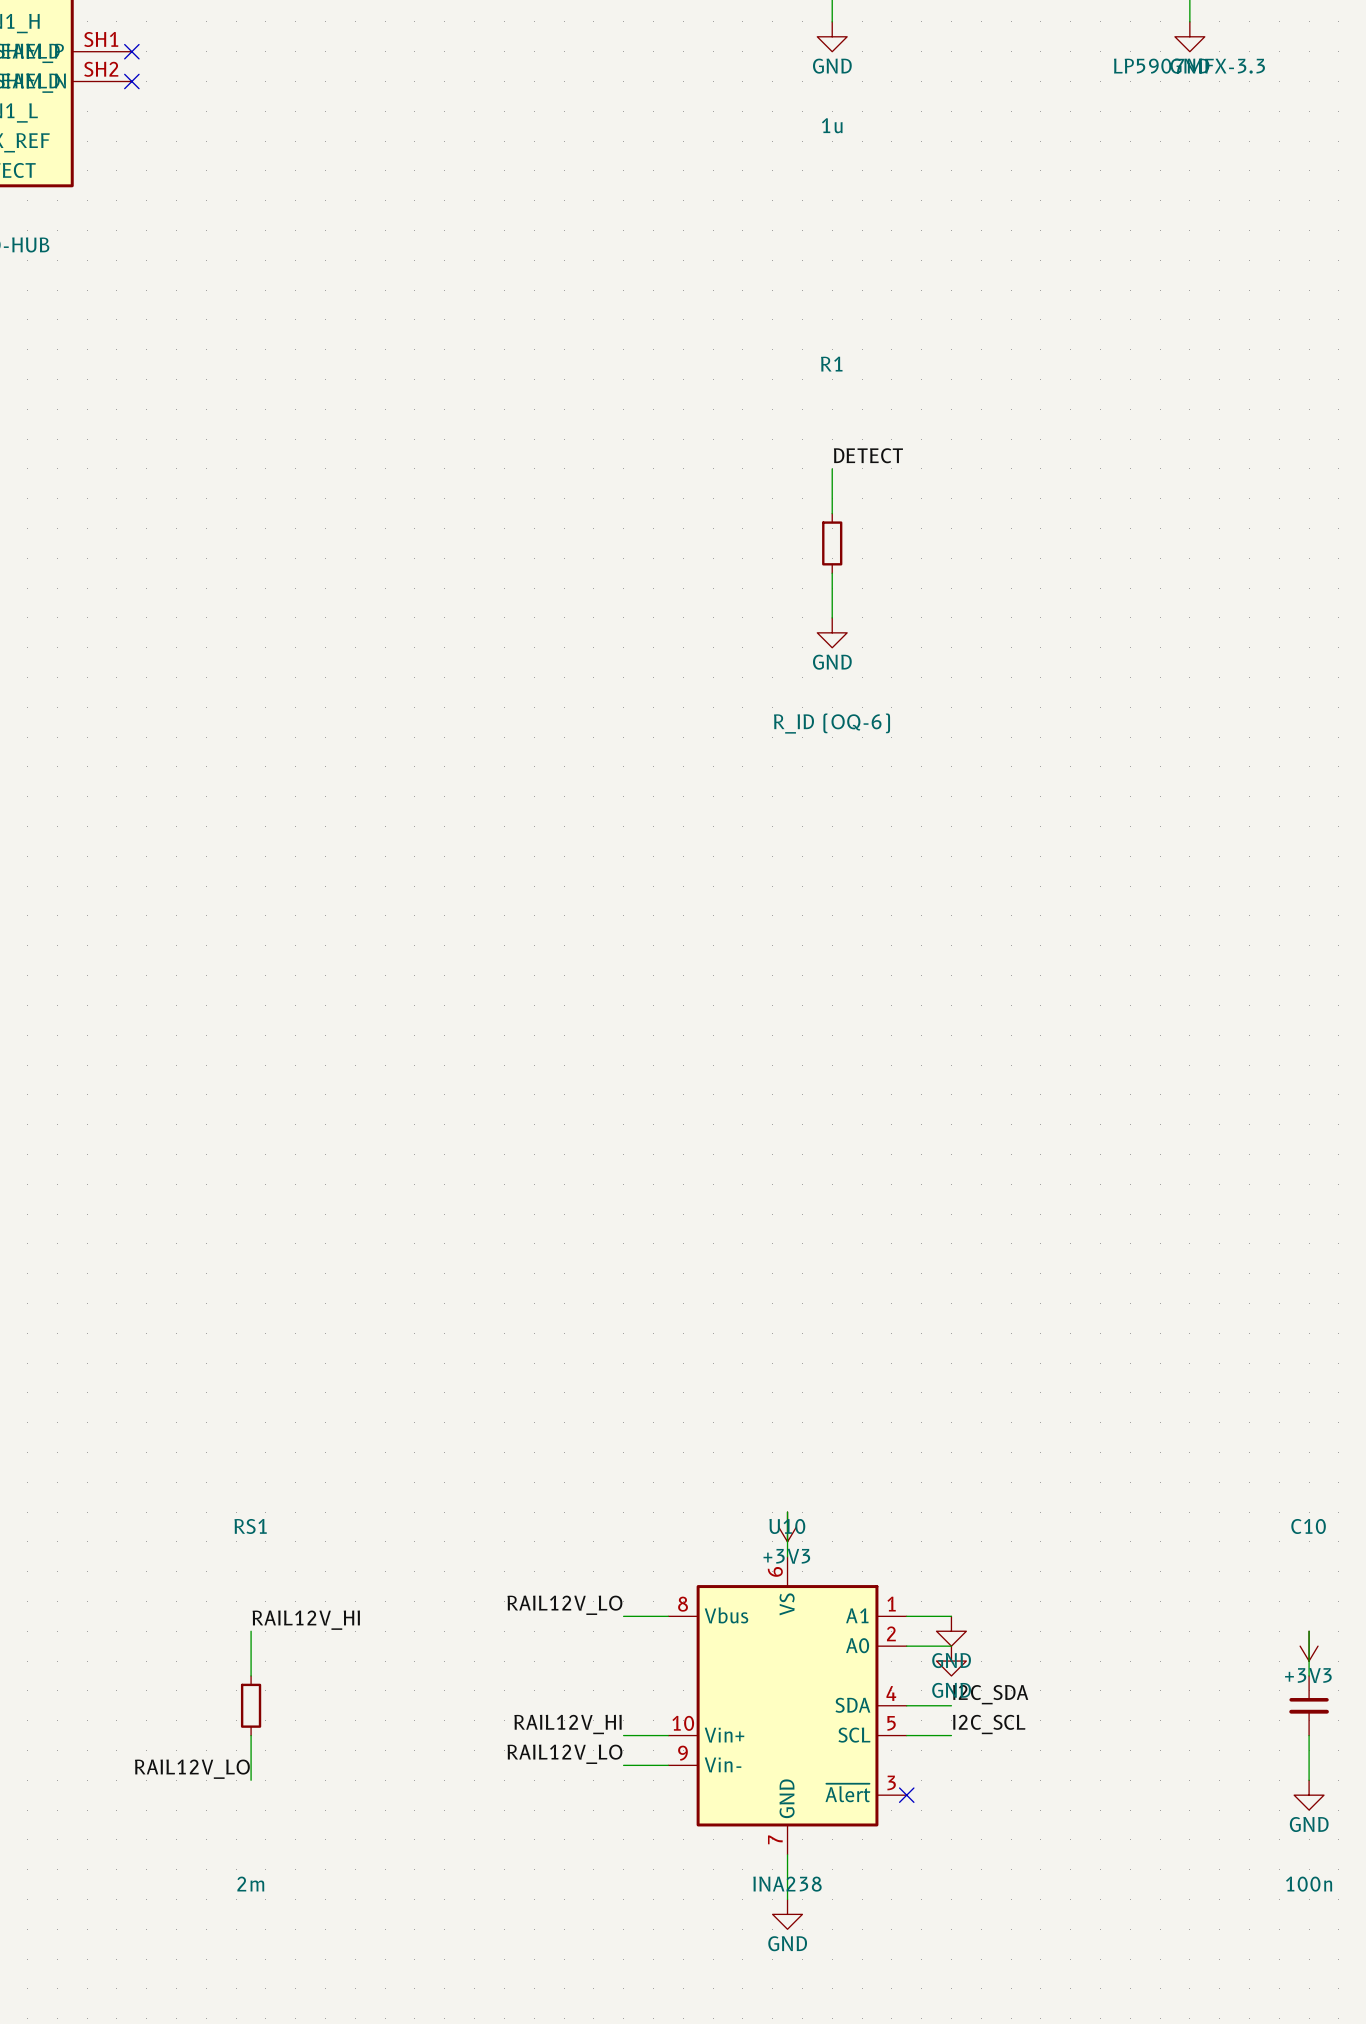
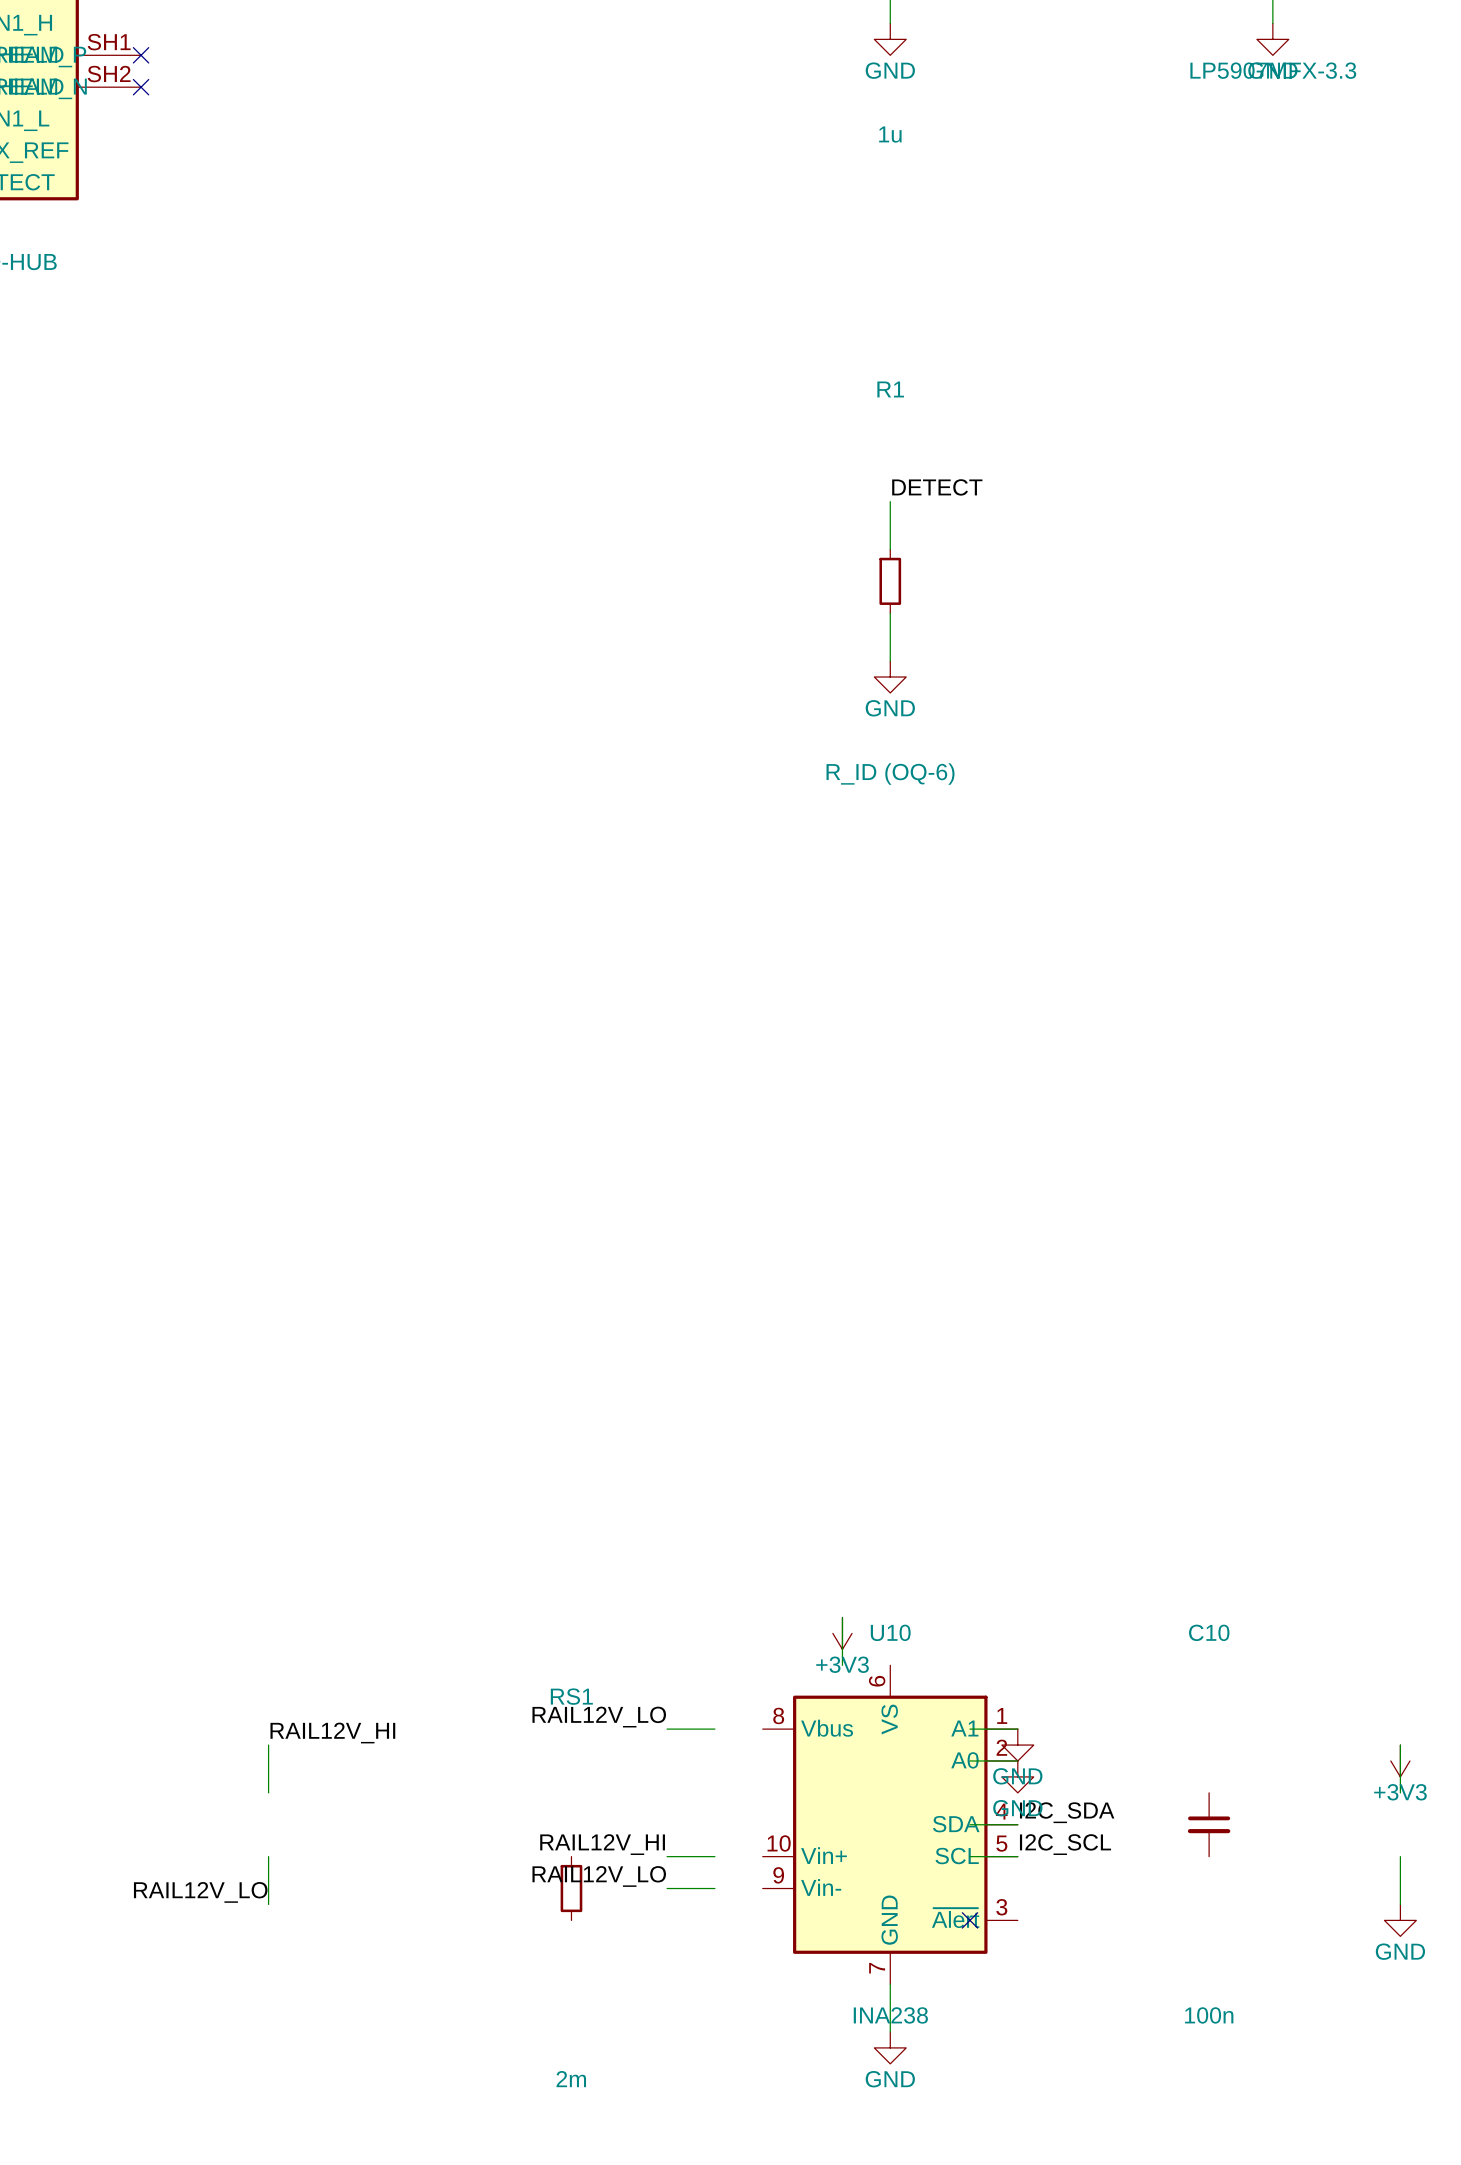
RS1 position: (251, 1705) -> (571, 1888)
U10 position: (787, 1705) -> (890, 1824)
C10 position: (1309, 1705) -> (1209, 1824)
wire: (787, 1854) (787, 1899) -> (890, 1984) (890, 2031)
power symbol position: GND (787, 1914) -> GND (890, 2047)

